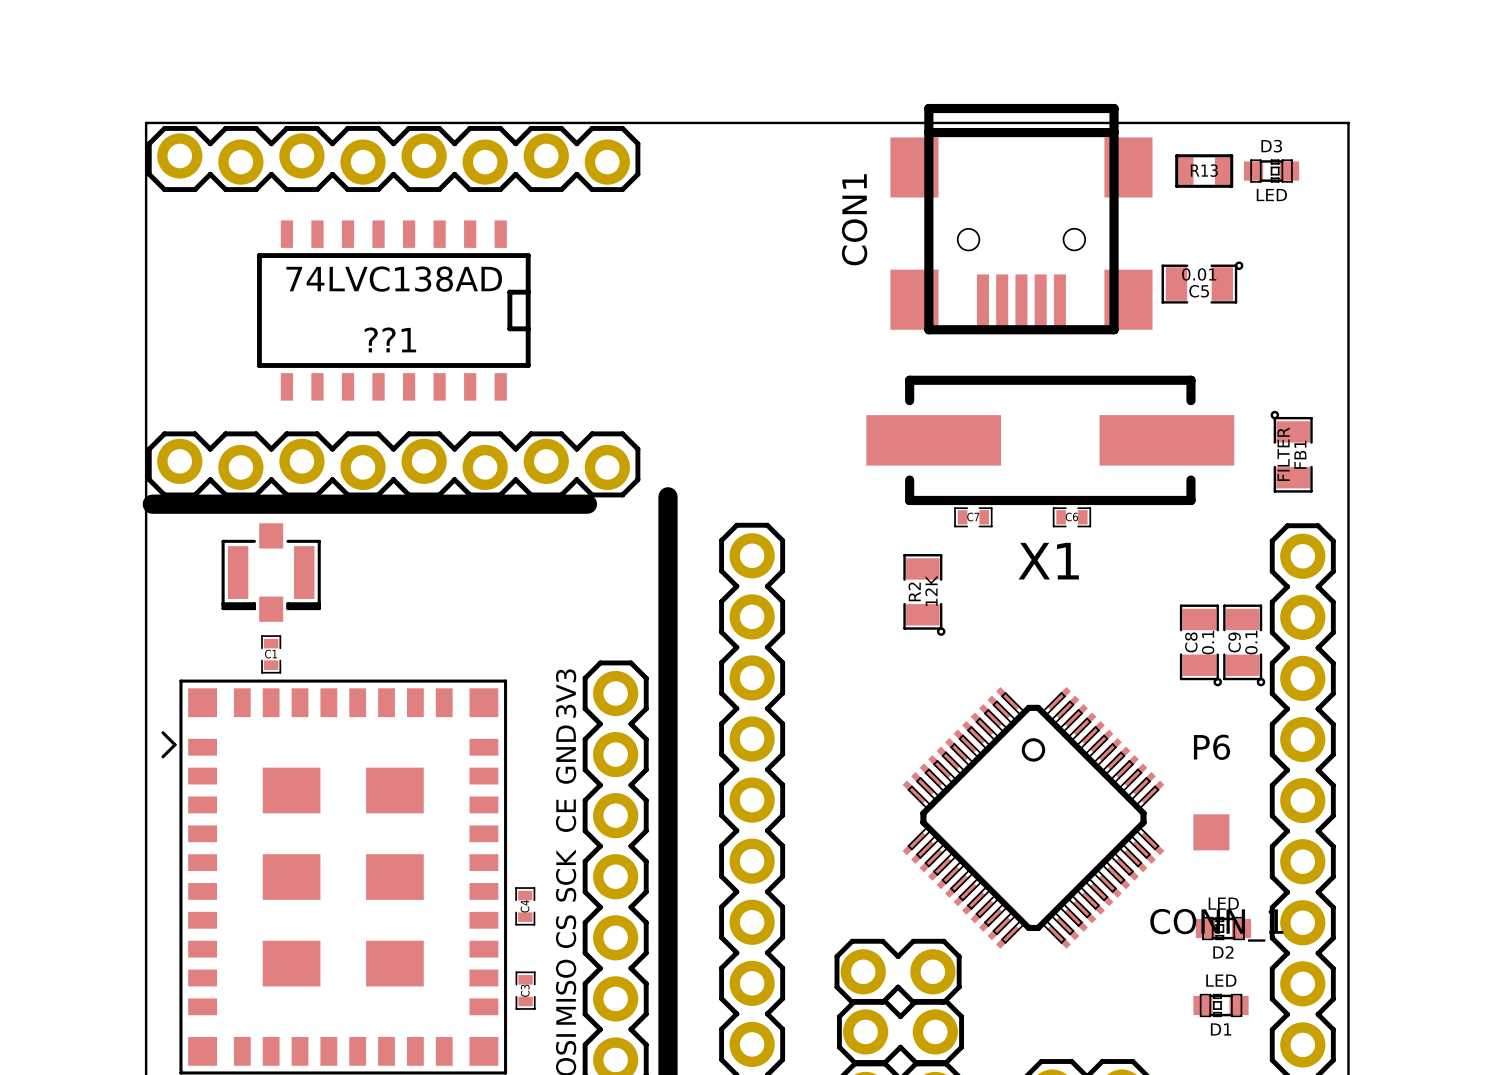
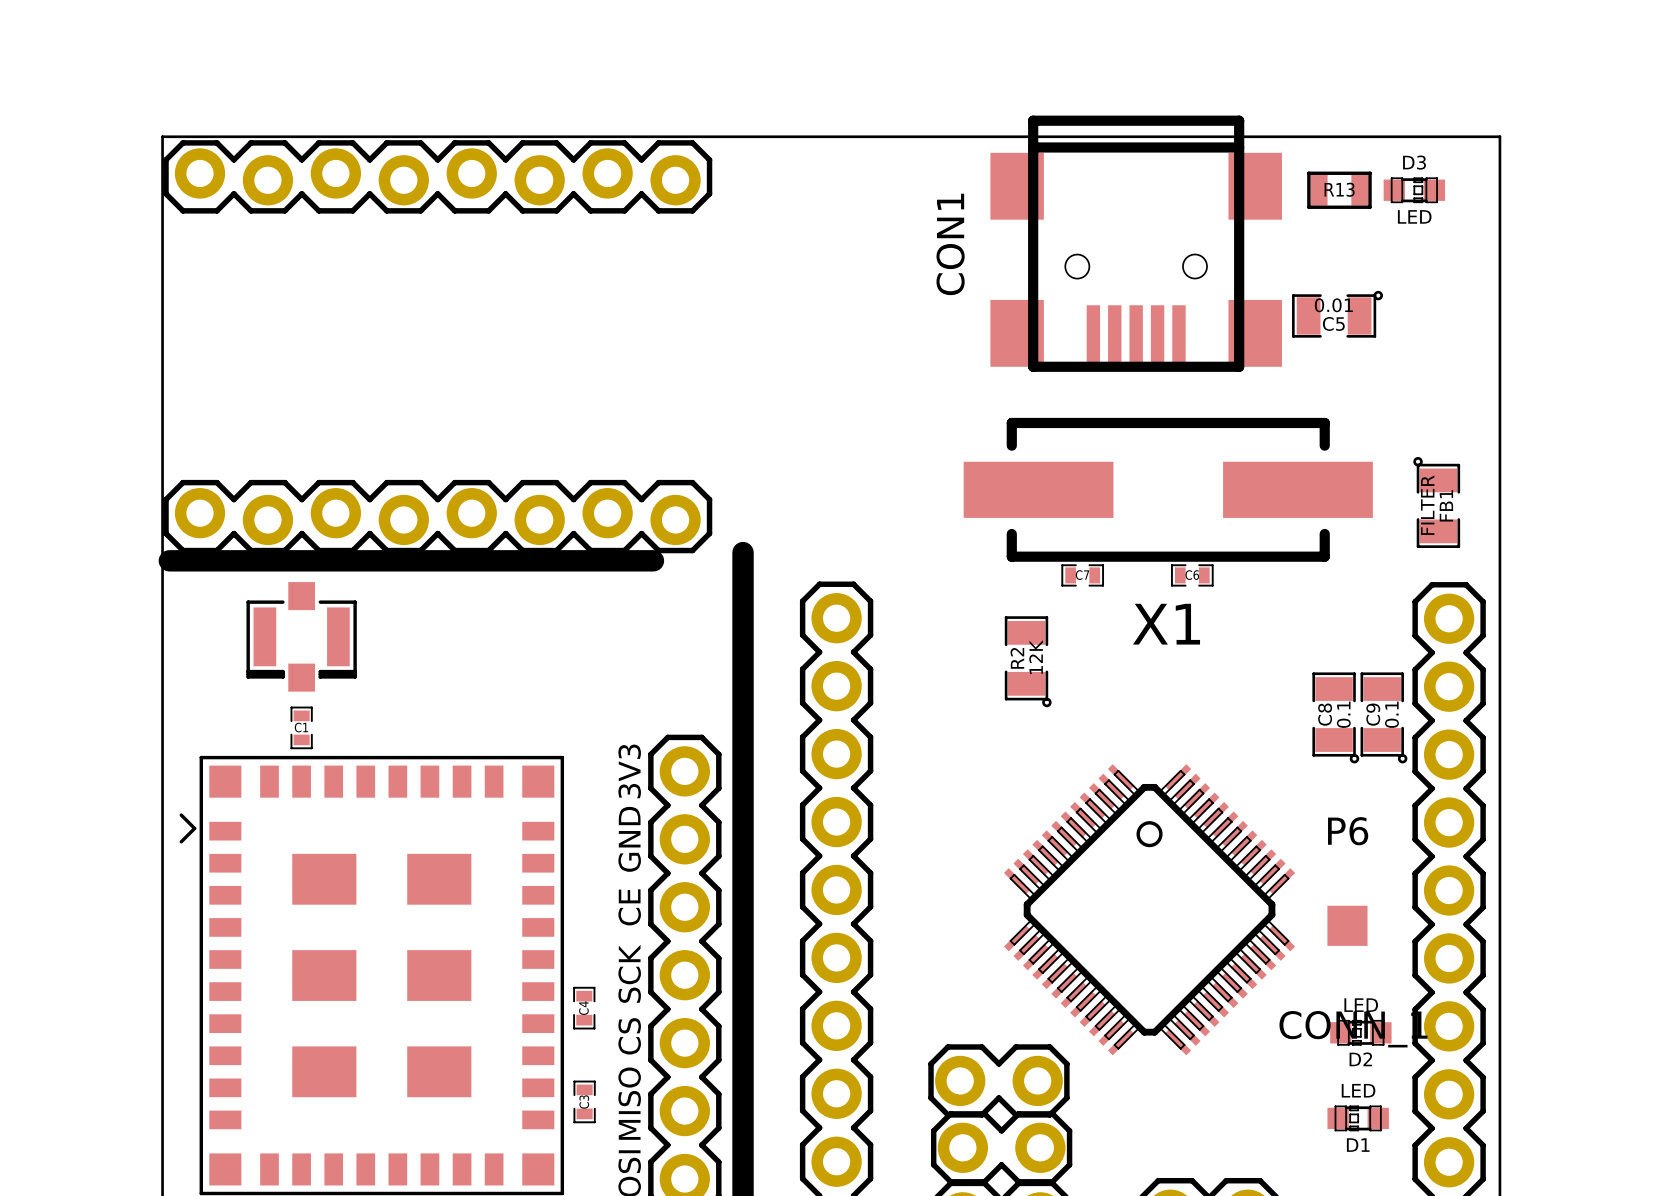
??1: 74LVC138AD (393, 310) -> none

